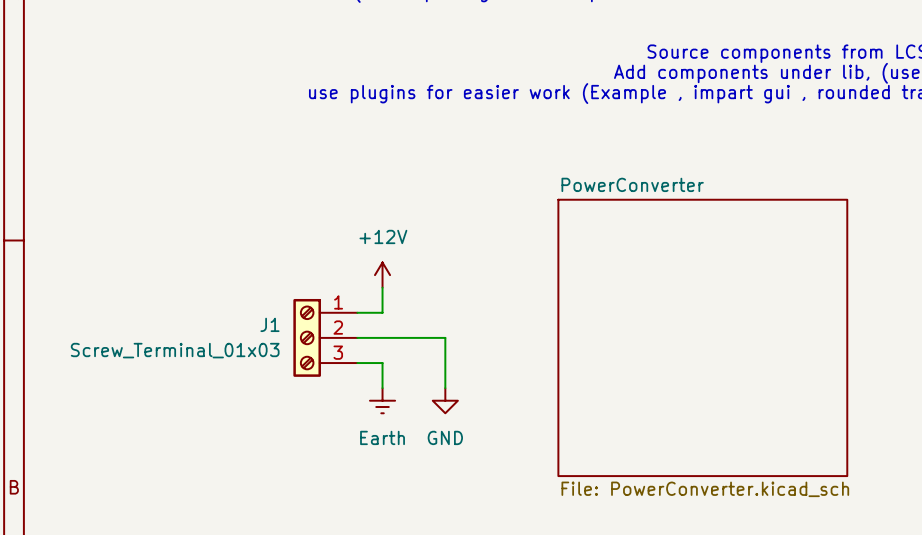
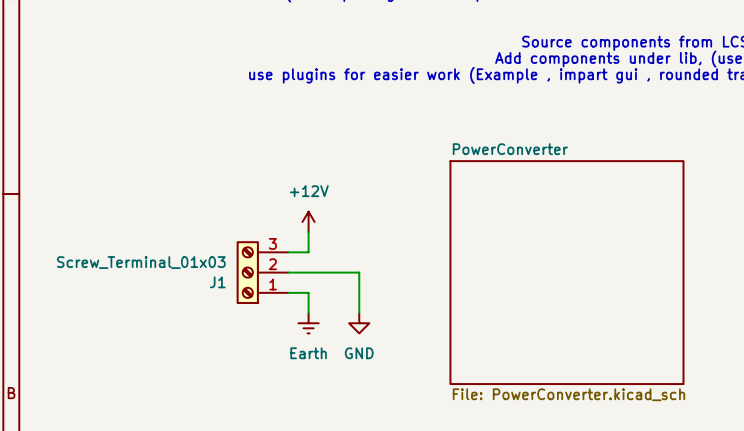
J1 flip: as is (307, 337) -> up-down (247, 272)

